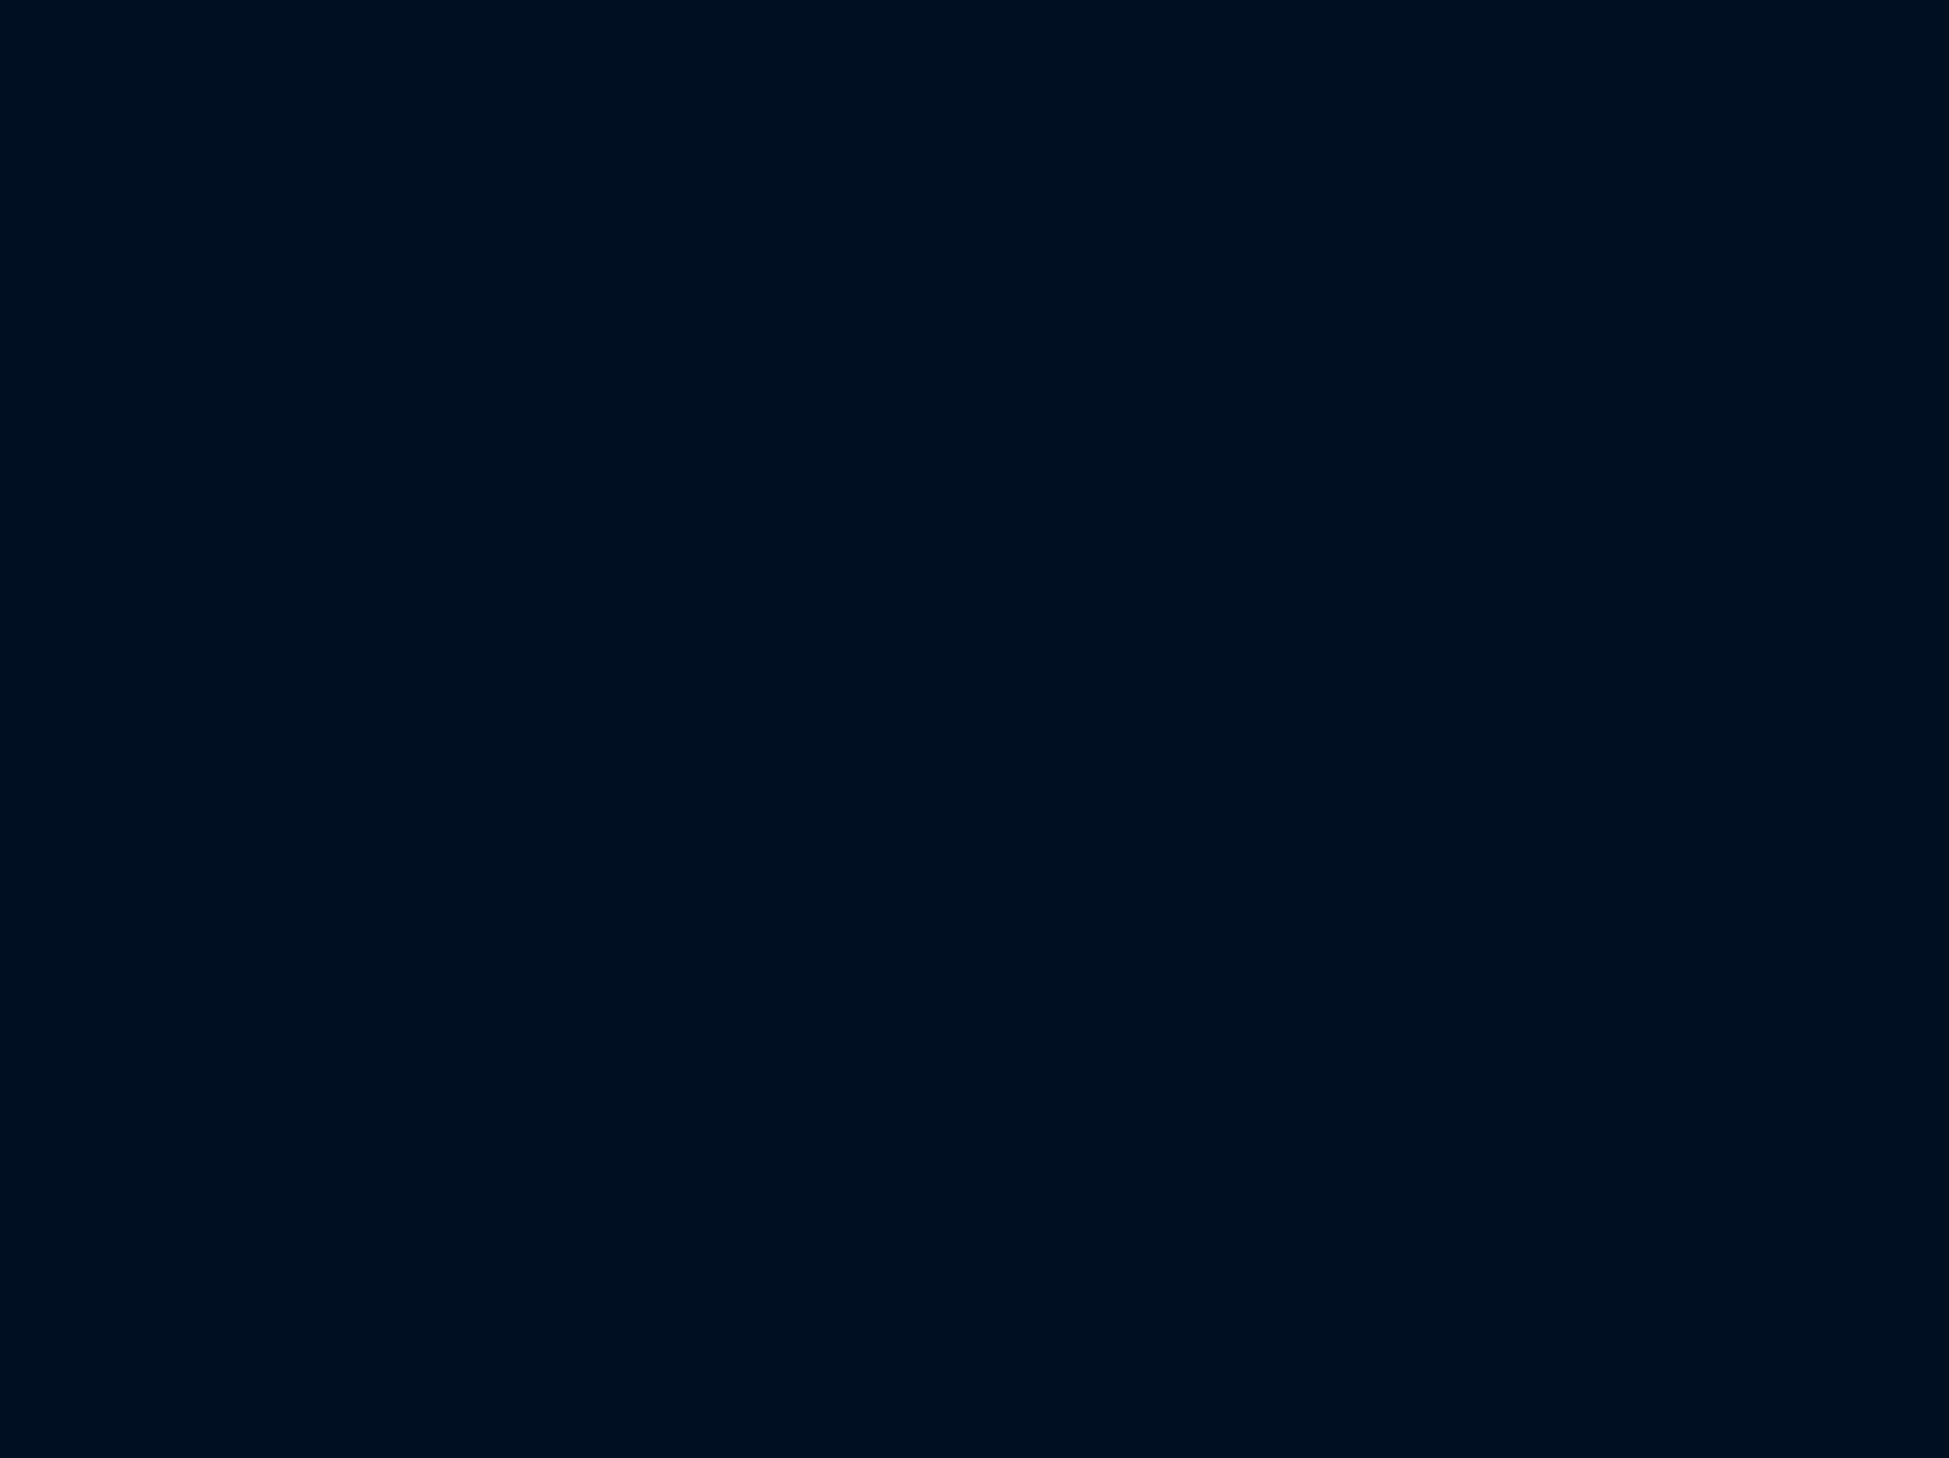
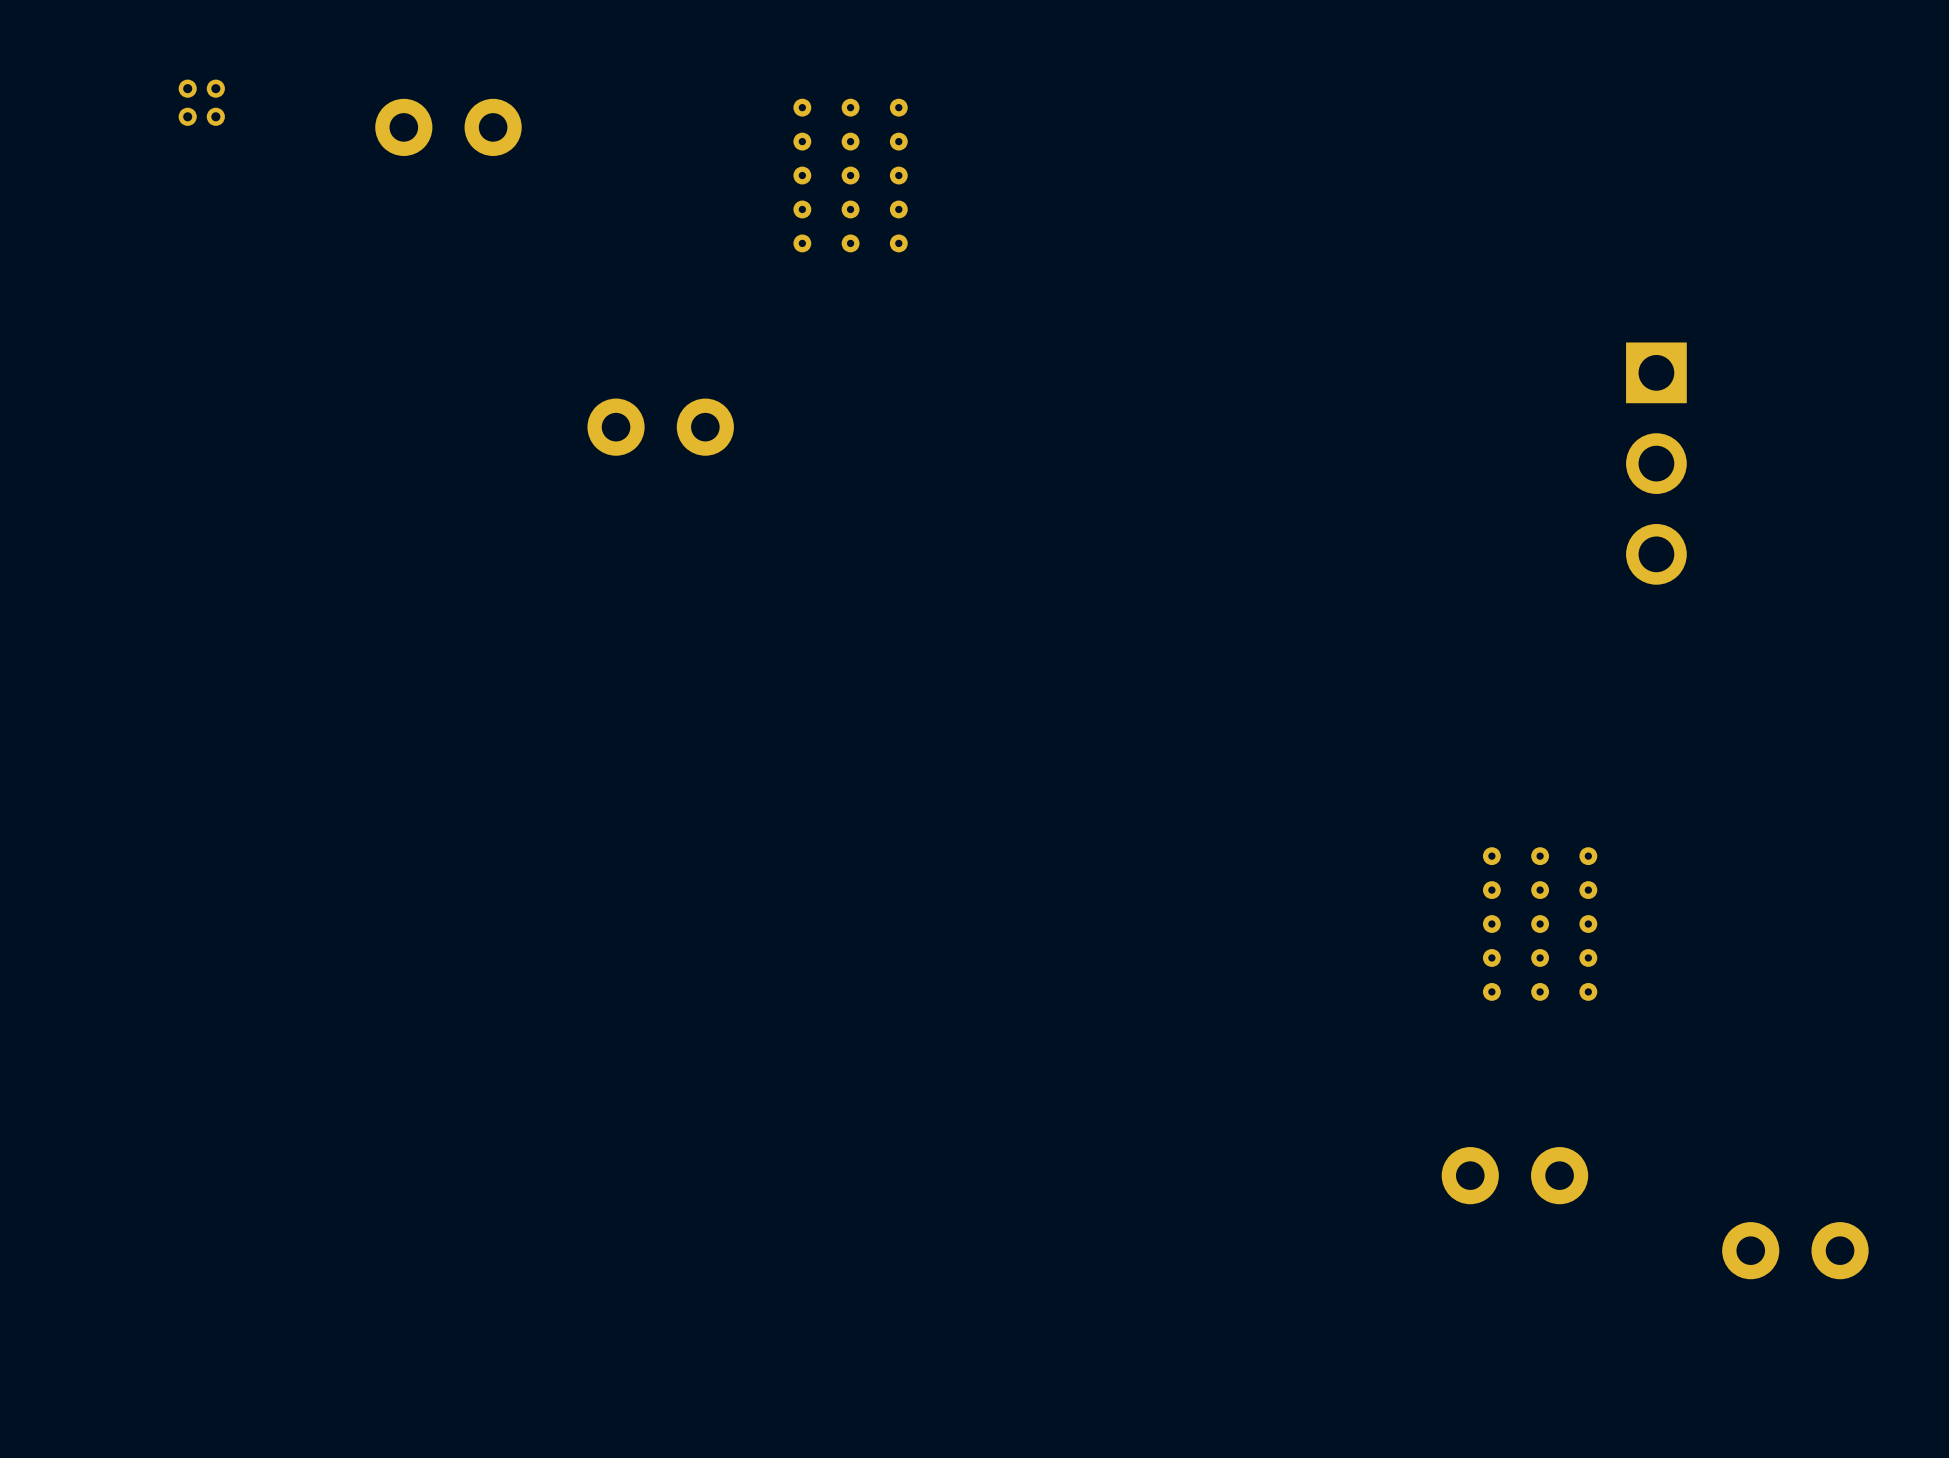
part: none -> (201, 102)
part: none -> (448, 127)
part: none -> (850, 175)
part: none -> (660, 427)
part: none -> (1656, 463)
part: none -> (1540, 924)
part: none -> (1514, 1175)
part: none -> (1795, 1250)

